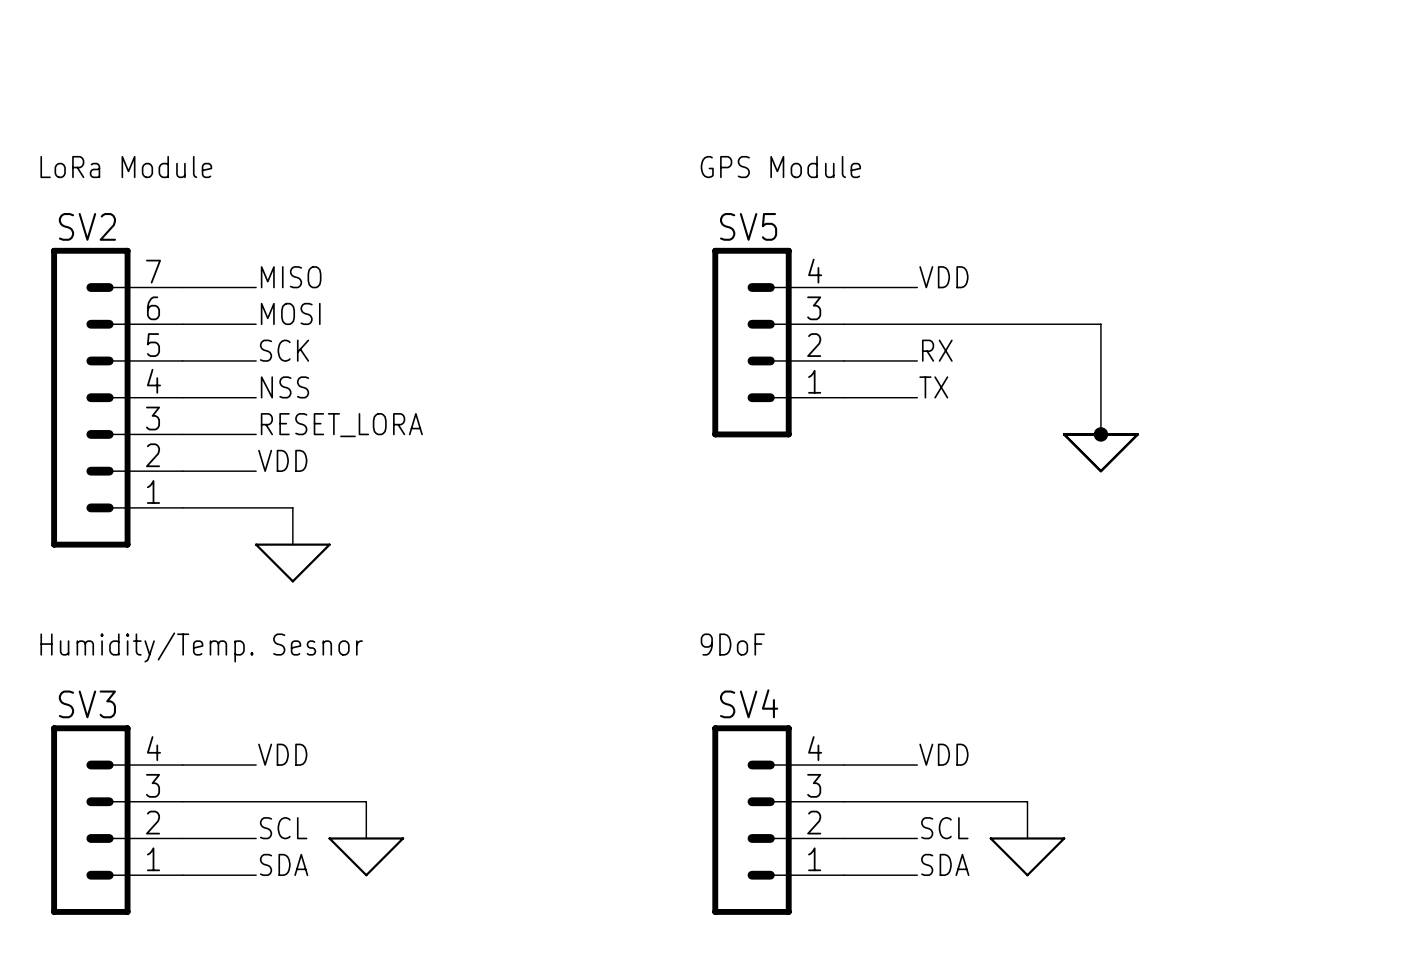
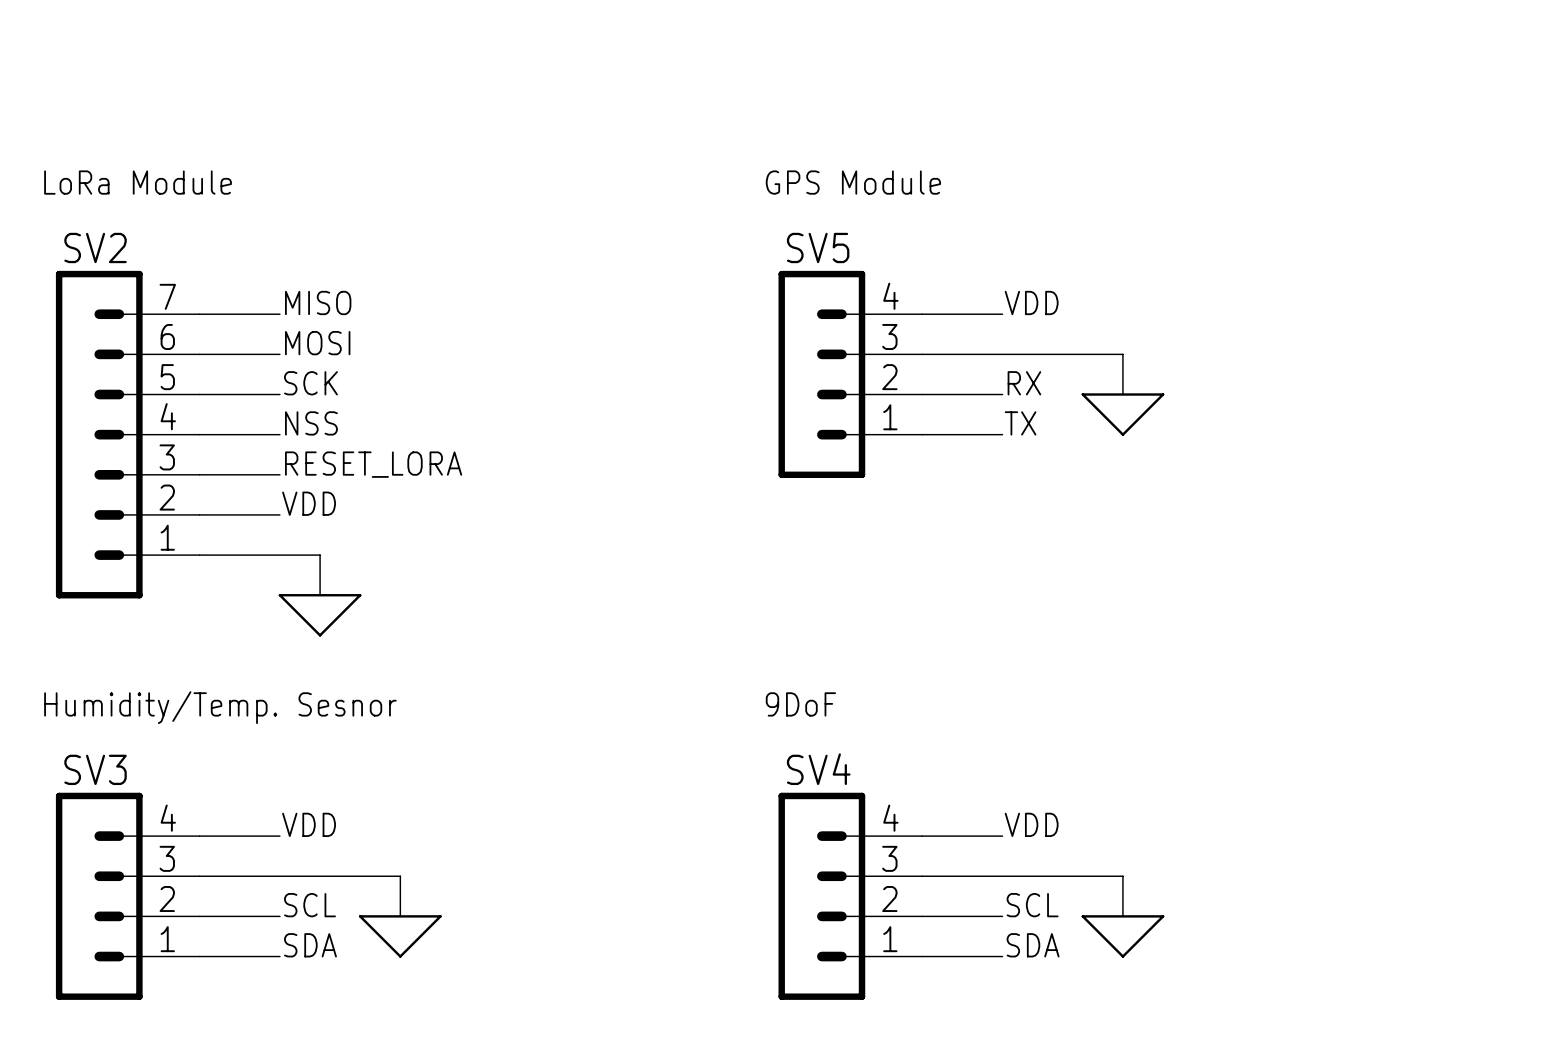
wire: (1027, 324) (1100, 324) (1100, 434) -> (1122, 354) (1122, 394)
junction: (1100, 434) -> none
power symbol position: (1100, 452) -> (1122, 414)

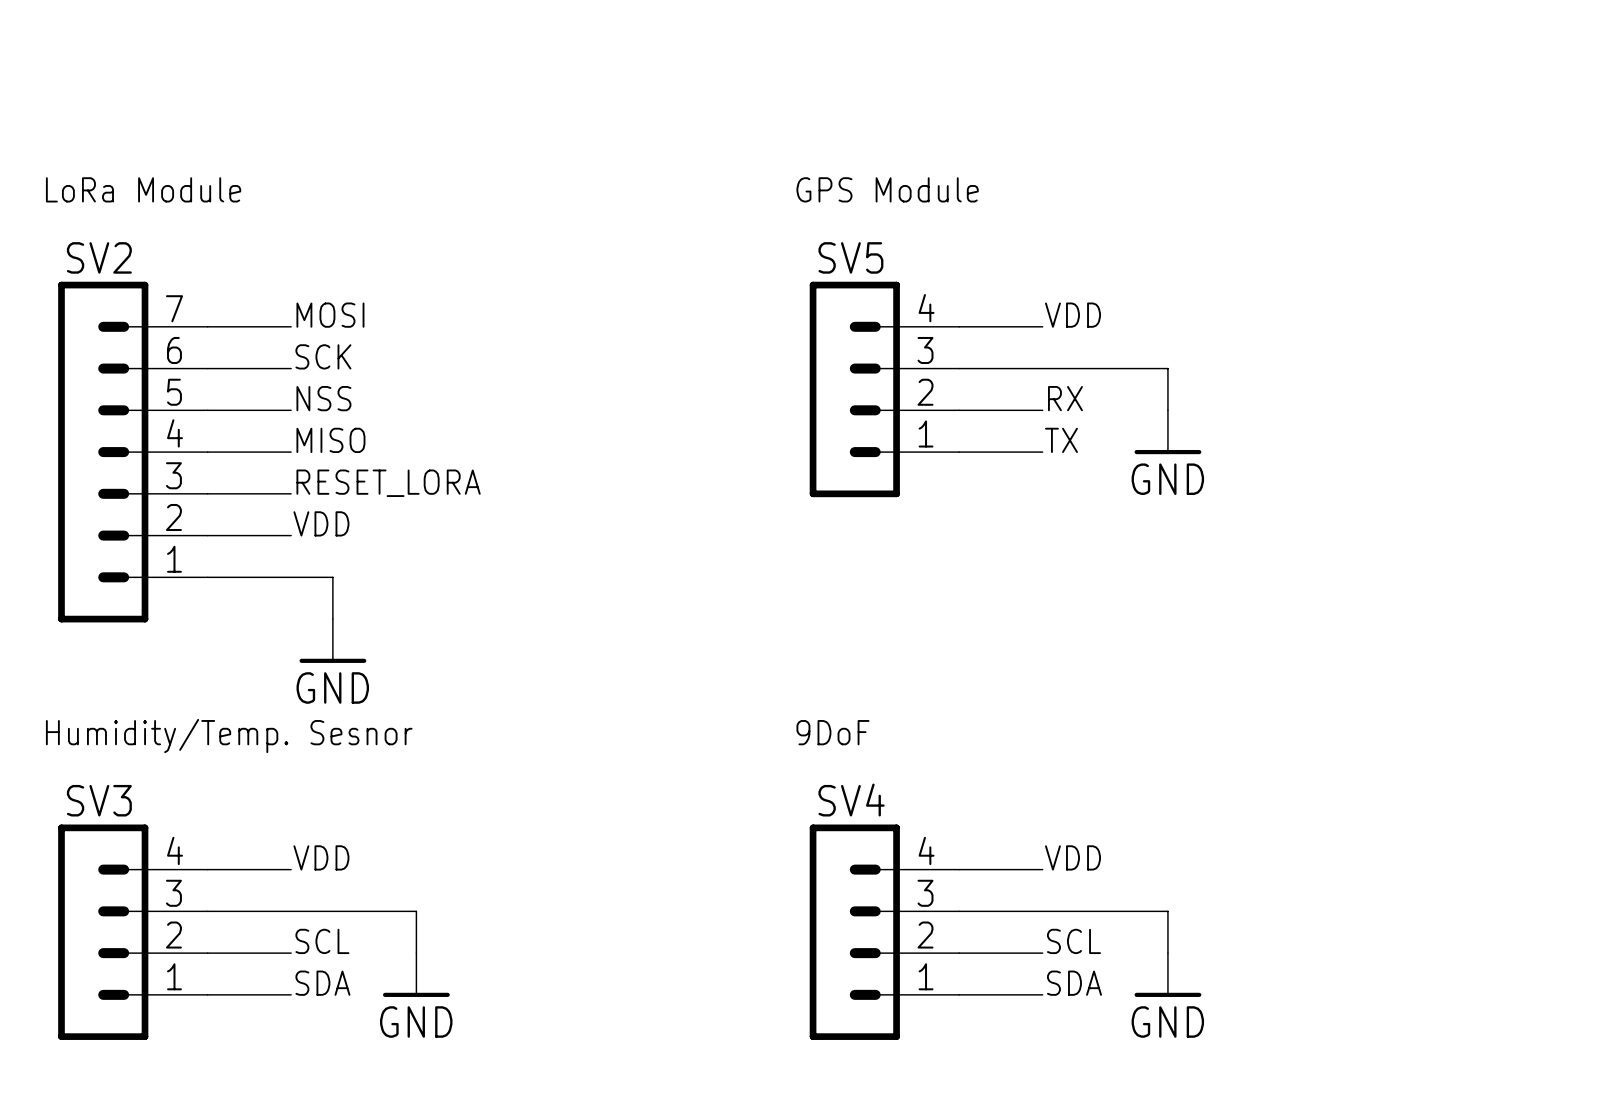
label: MISO (318, 302) -> MOSI (330, 315)
label: MOSI (317, 343) -> SCK (323, 356)
label: SCK (310, 383) -> NSS (323, 398)
power symbol shape: [1081, 393, 1165, 436] -> [1134, 410, 1202, 455]
label: NSS (311, 423) -> MISO (330, 440)
power symbol text: none -> GND (1167, 479)
power symbol shape: [278, 594, 362, 637] -> [299, 619, 367, 663]
power symbol text: none -> GND (332, 687)
power symbol shape: [359, 915, 442, 958] -> [383, 953, 450, 997]
power symbol shape: [1081, 915, 1165, 958] -> [1134, 953, 1202, 997]
power symbol text: none -> GND (416, 1022)
power symbol text: none -> GND (1167, 1022)

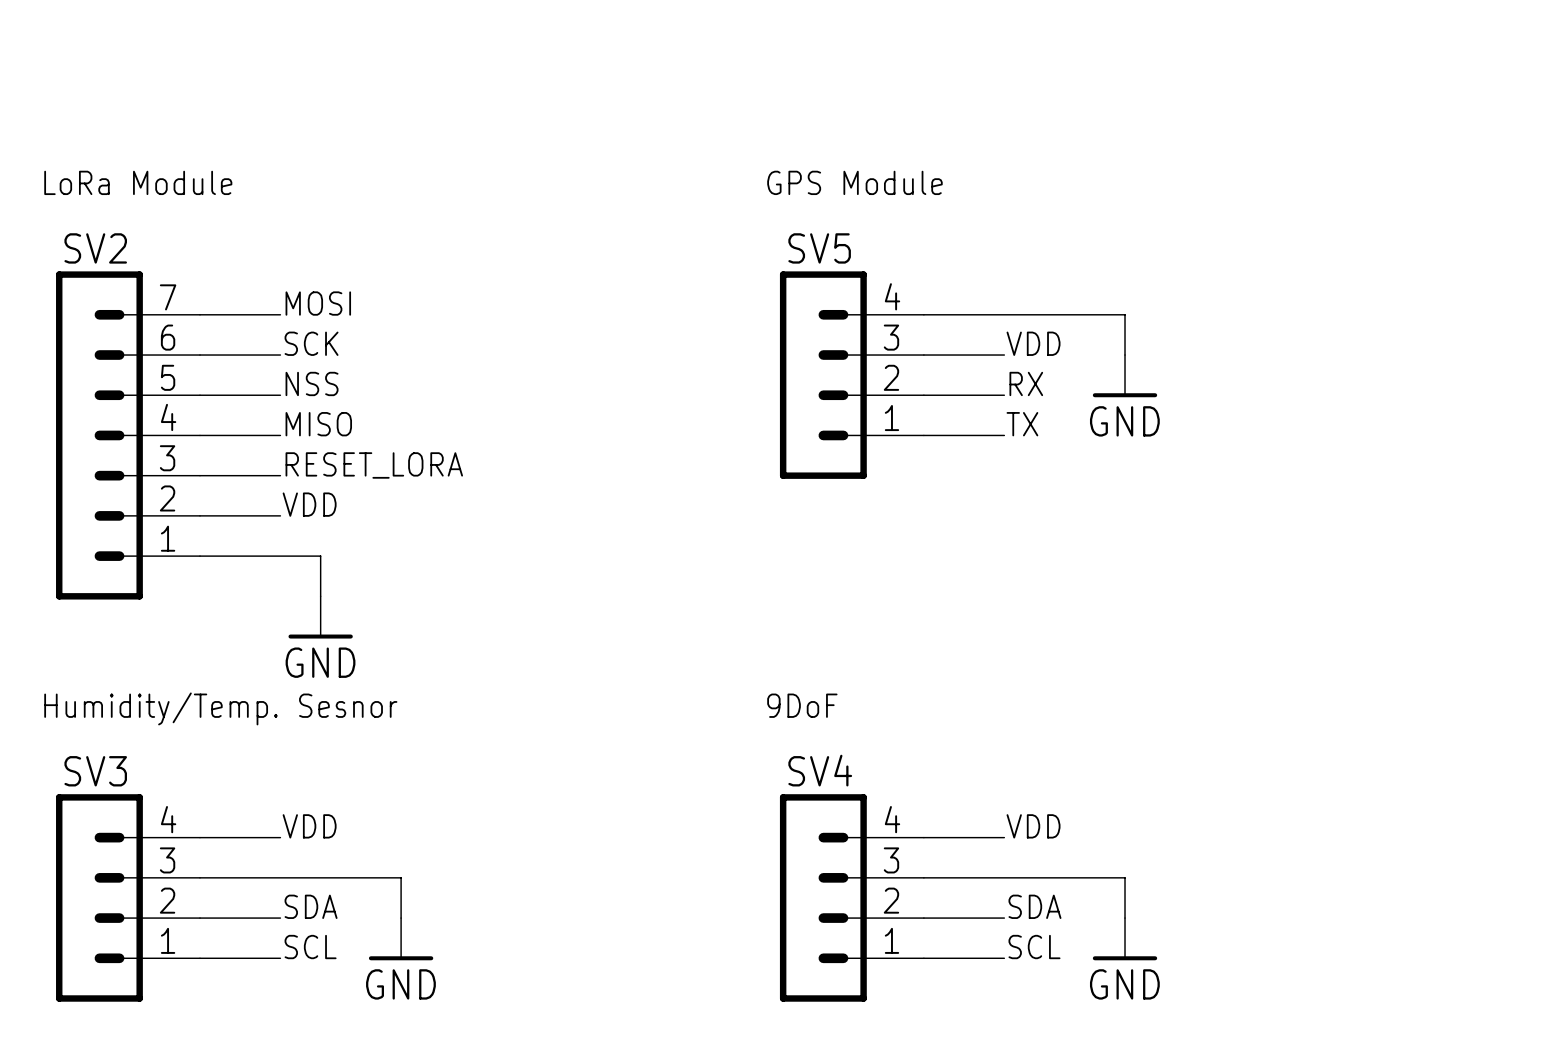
label position: VDD (1072, 315) -> VDD (1033, 343)
wire: (1042, 368) (1167, 368) (1167, 410) -> (1004, 314) (1125, 314) (1125, 355)
power symbol position: GND (1167, 432) -> GND (1125, 376)
label: SCL (322, 941) -> SDA (311, 906)
label: SCL (1073, 941) -> SDA (1034, 906)
label: SDA (322, 983) -> SCL (310, 947)
label: SDA (1074, 983) -> SCL (1034, 947)

